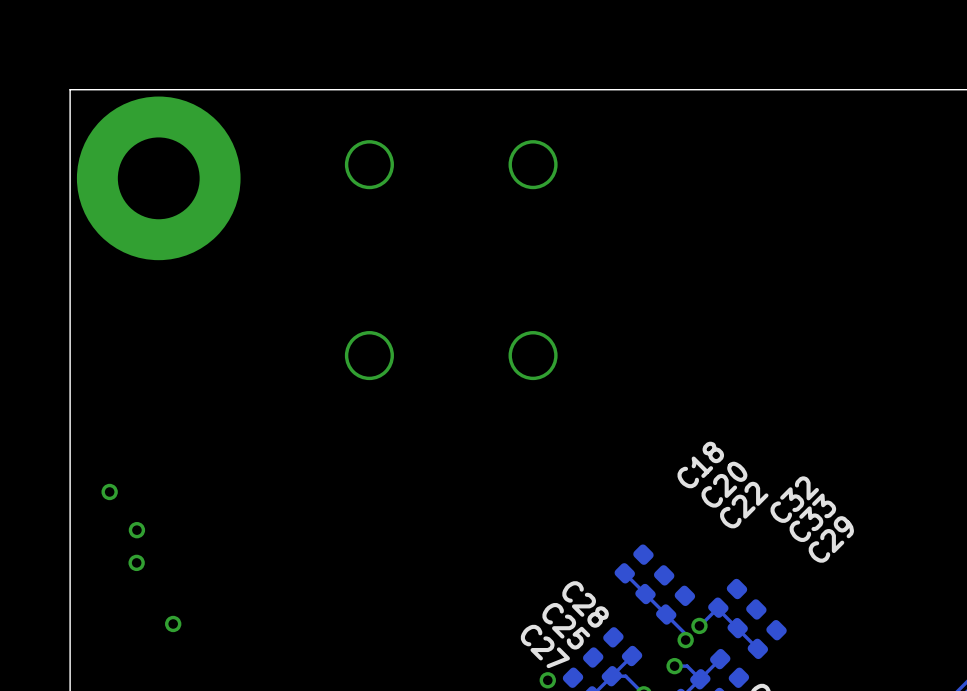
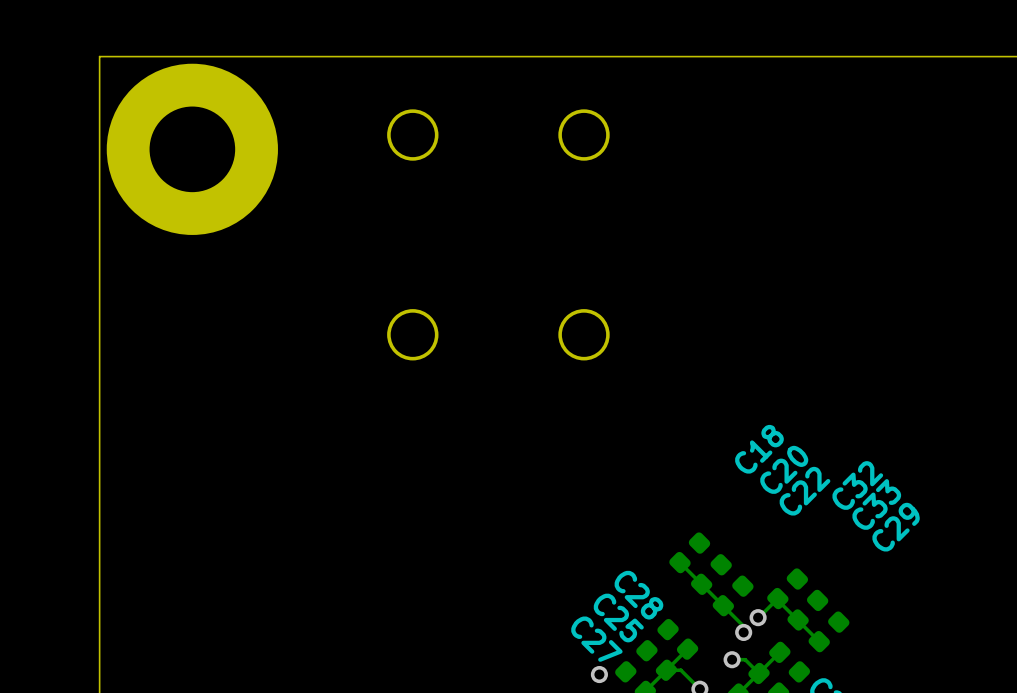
via: (109, 491) -> none
via: (136, 530) -> none
via: (136, 562) -> none
via: (173, 623) -> none

